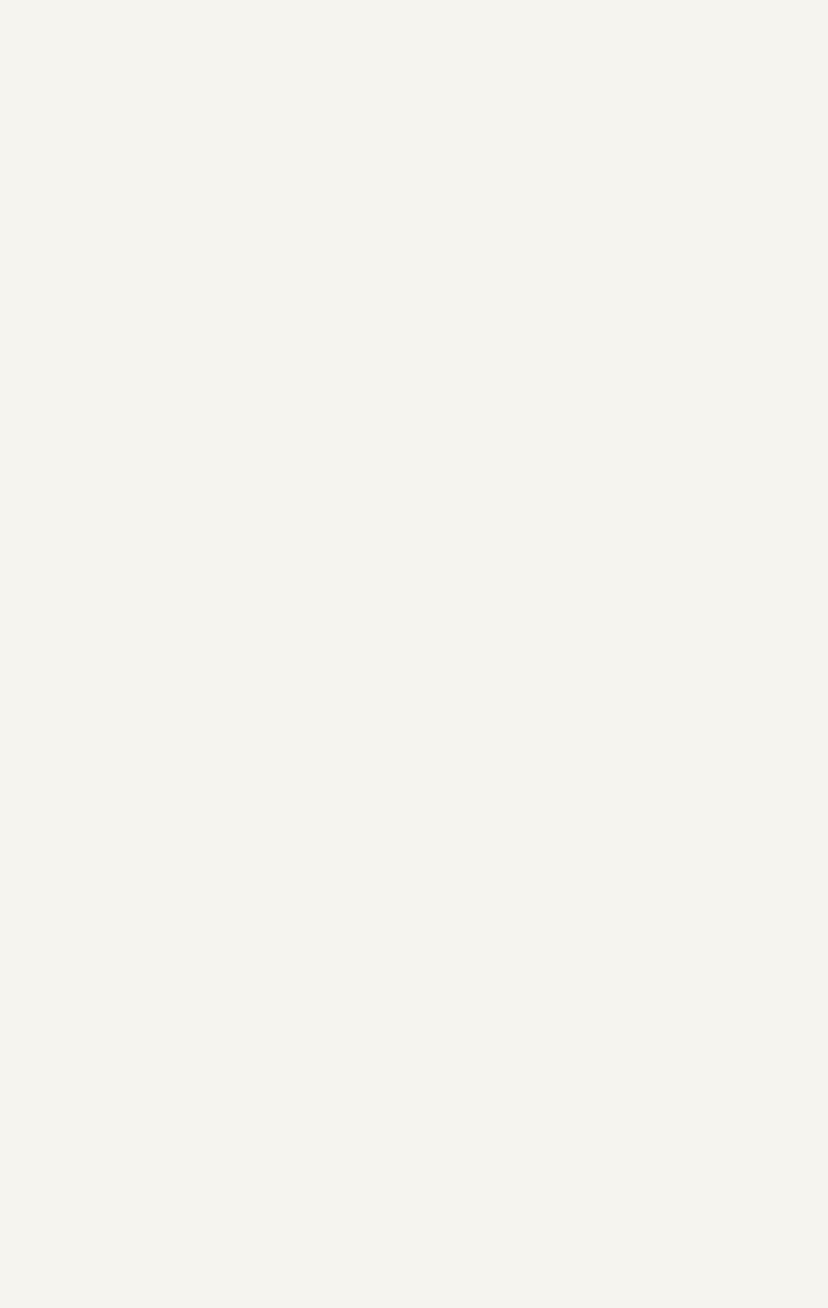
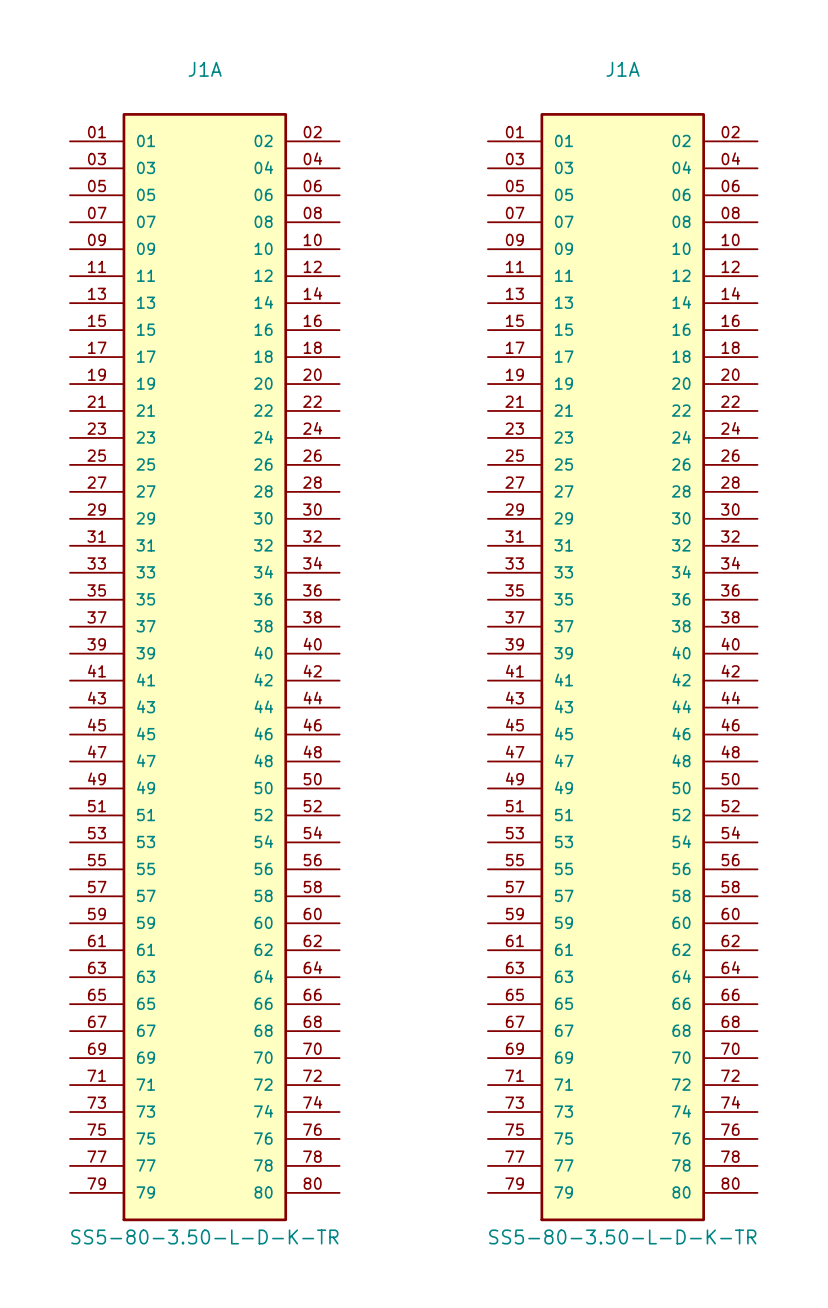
J1A: none -> SS5-80-3.50-L-D-K-TR (204, 667)
J1A: none -> SS5-80-3.50-L-D-K-TR (622, 667)

